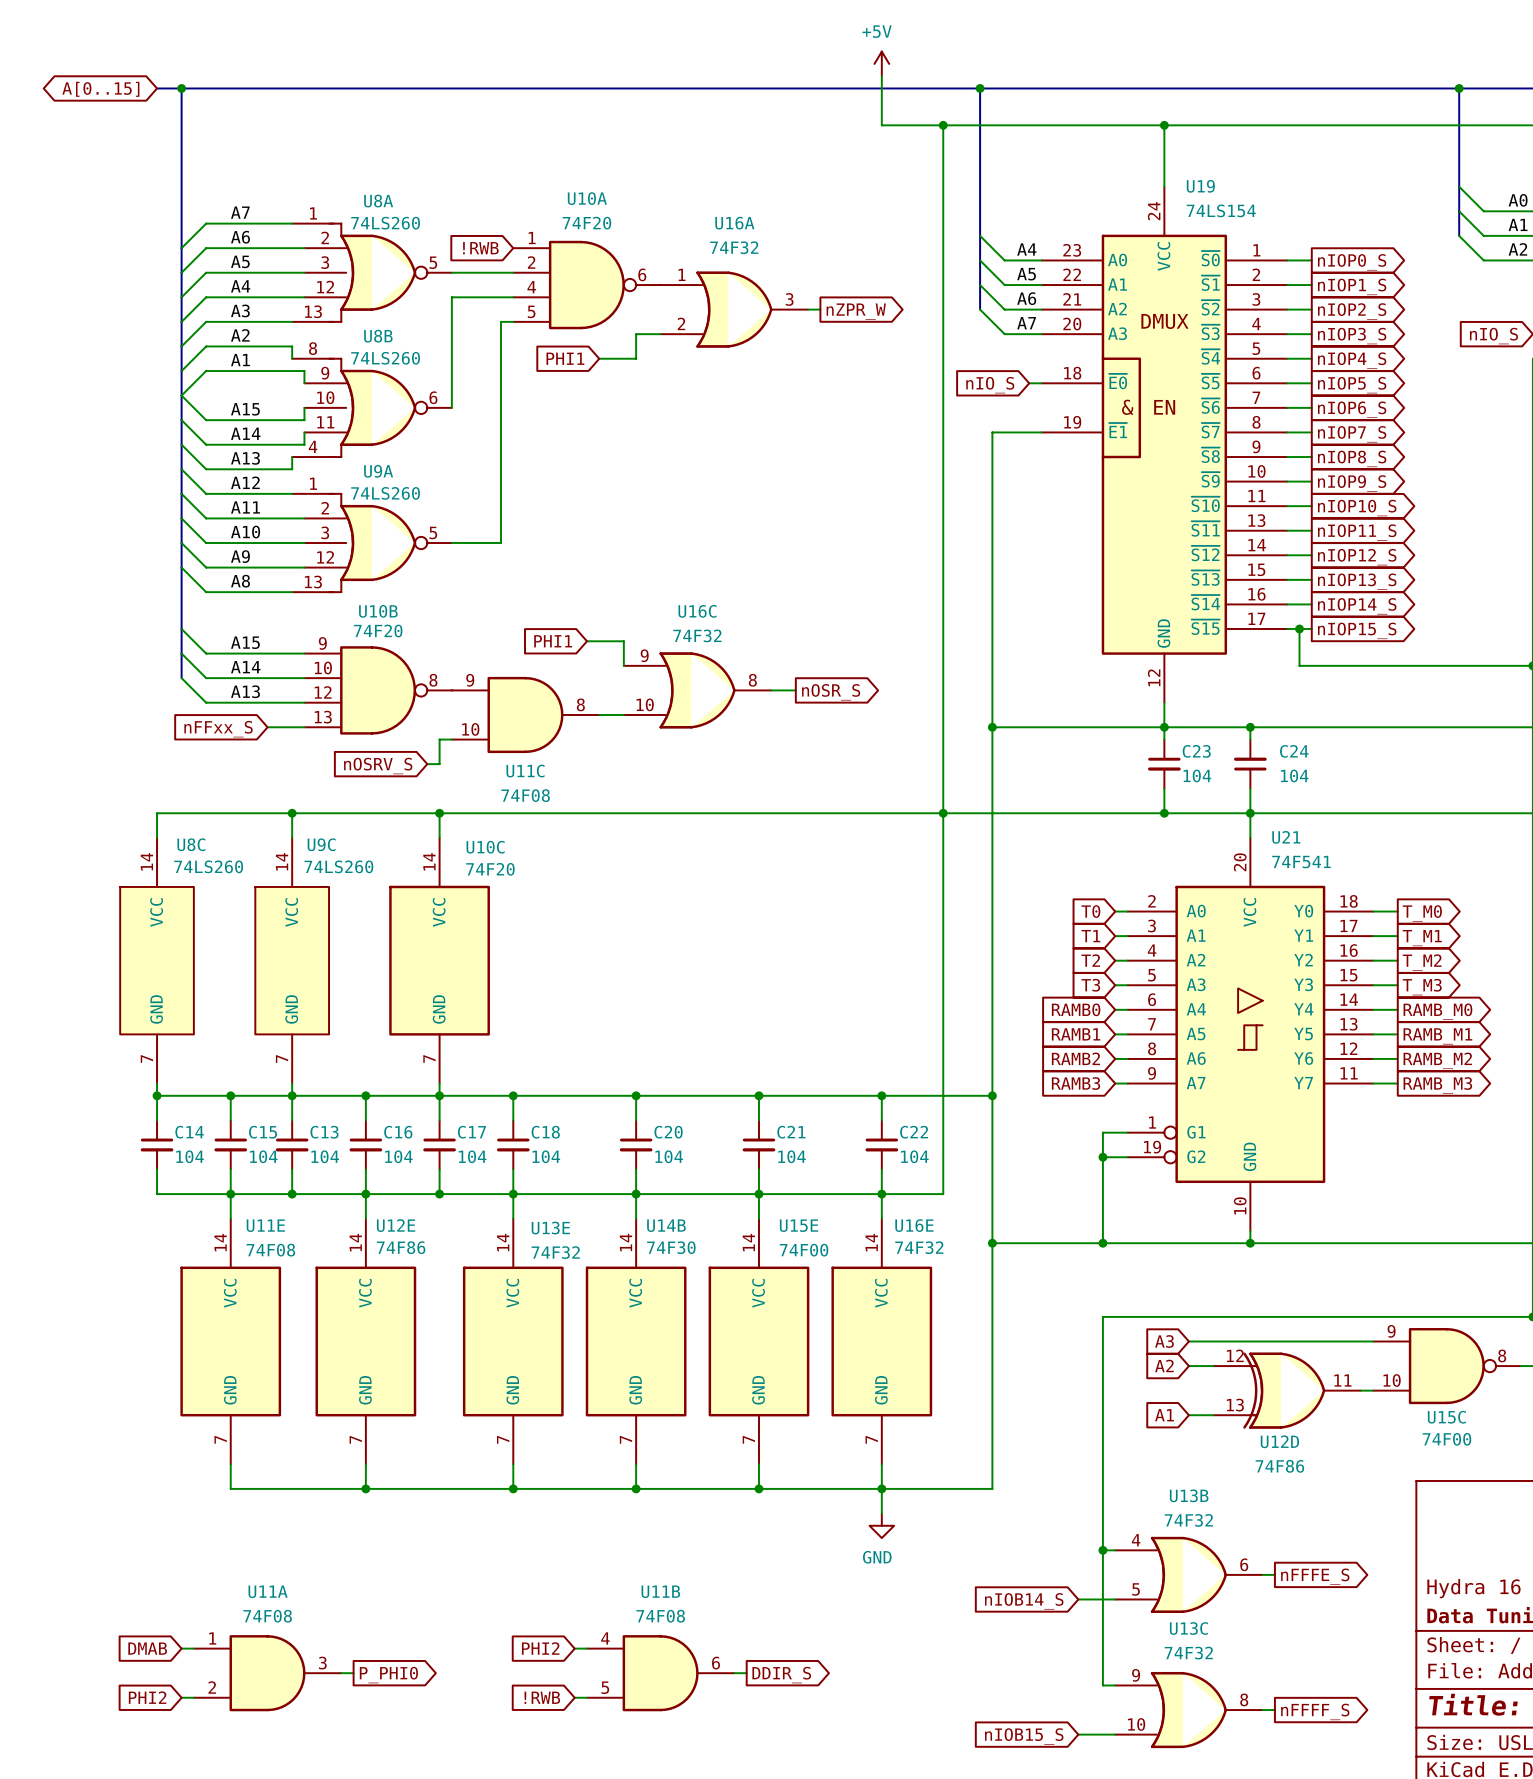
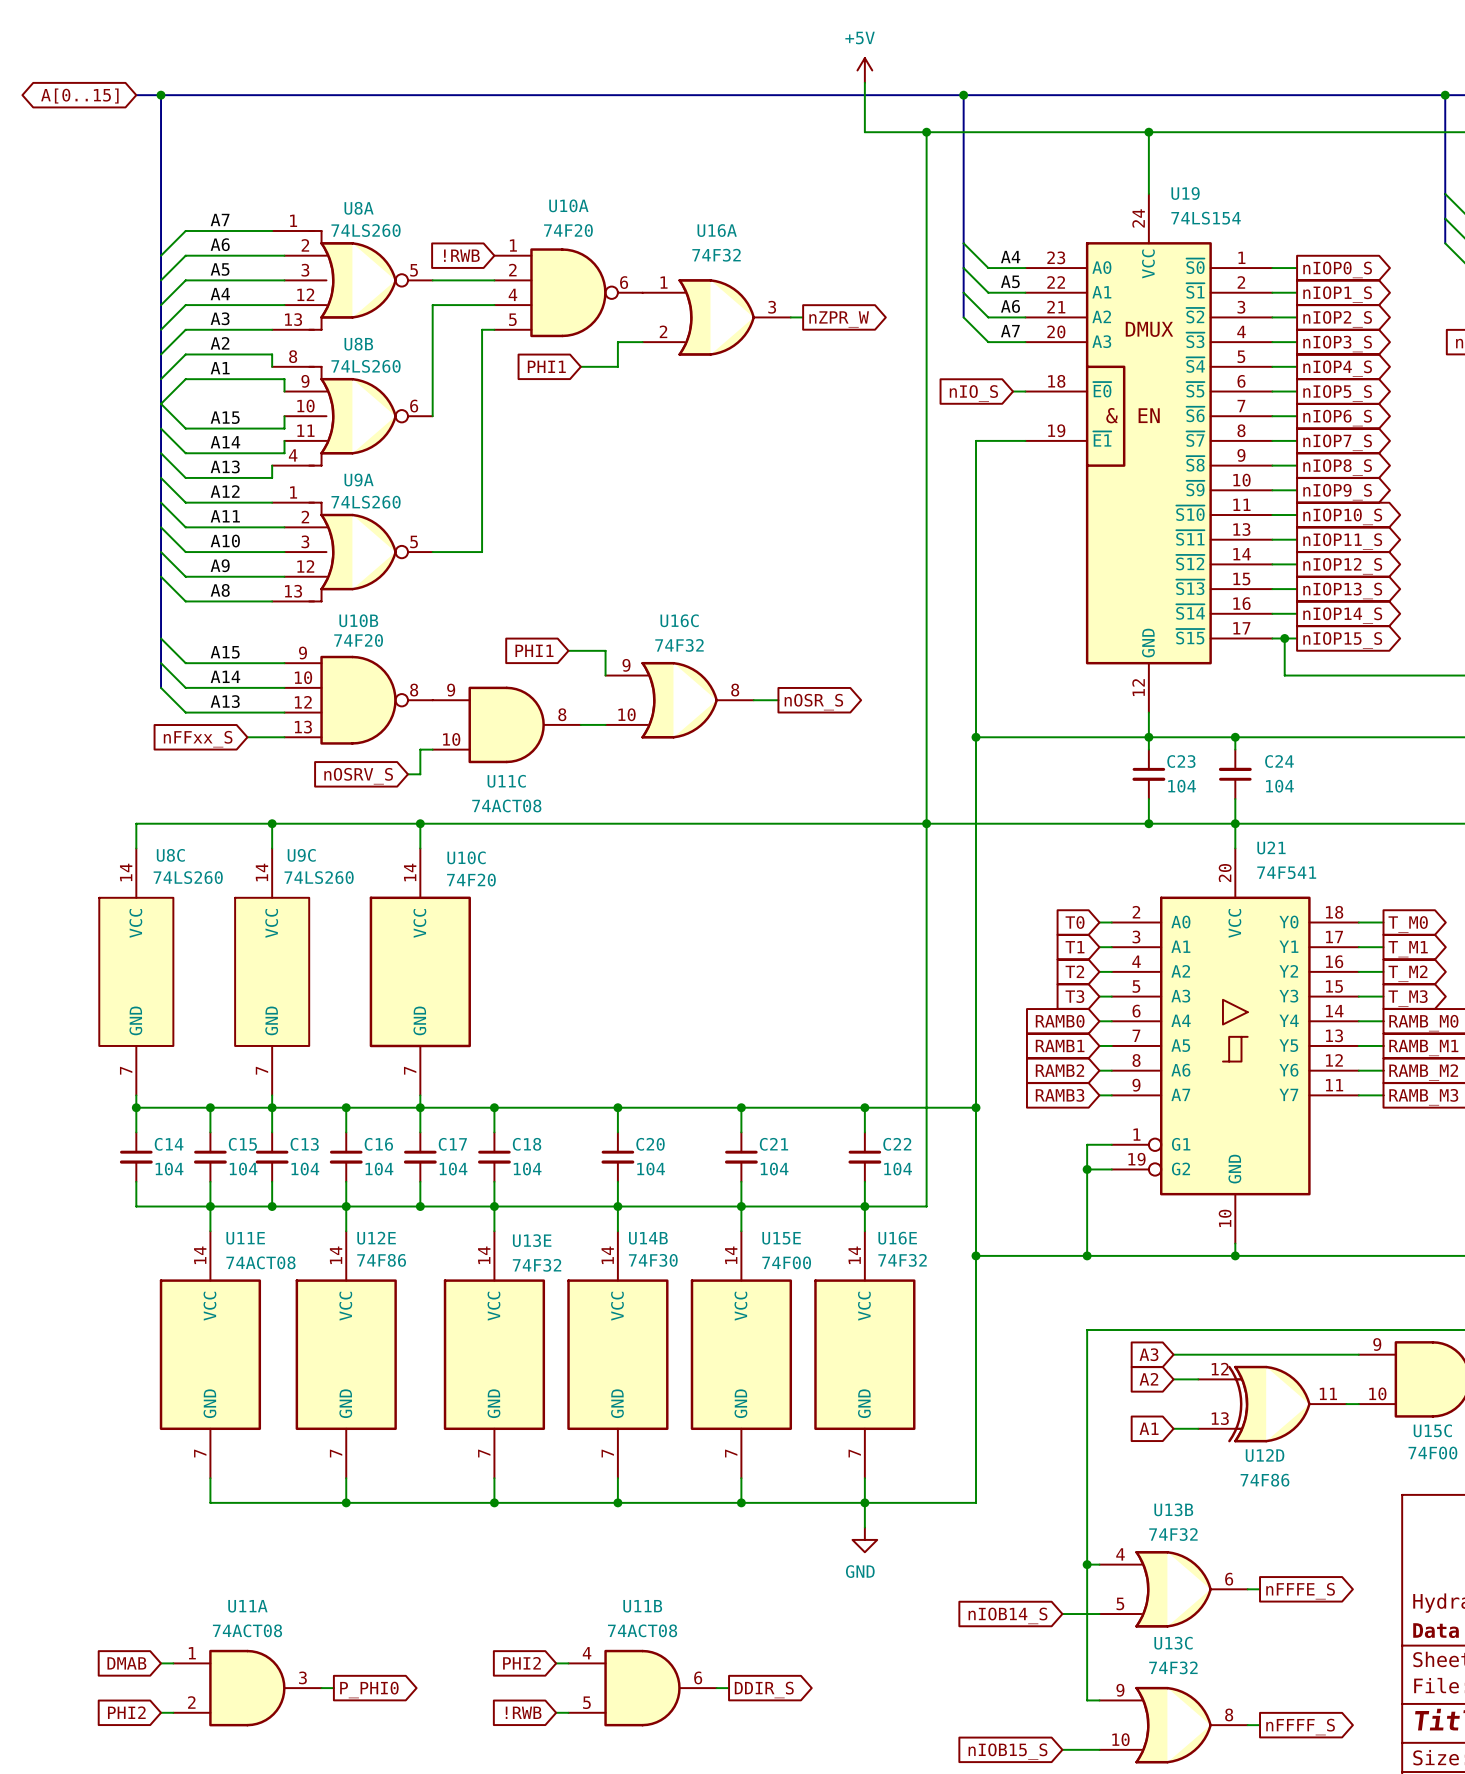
U11C value: 74F08 (525, 795) -> 74ACT08 (506, 805)
U11E value: 74F08 (270, 1250) -> 74ACT08 (260, 1262)
U11A value: 74F08 (267, 1616) -> 74ACT08 (247, 1630)
U11B value: 74F08 (660, 1616) -> 74ACT08 (642, 1630)

